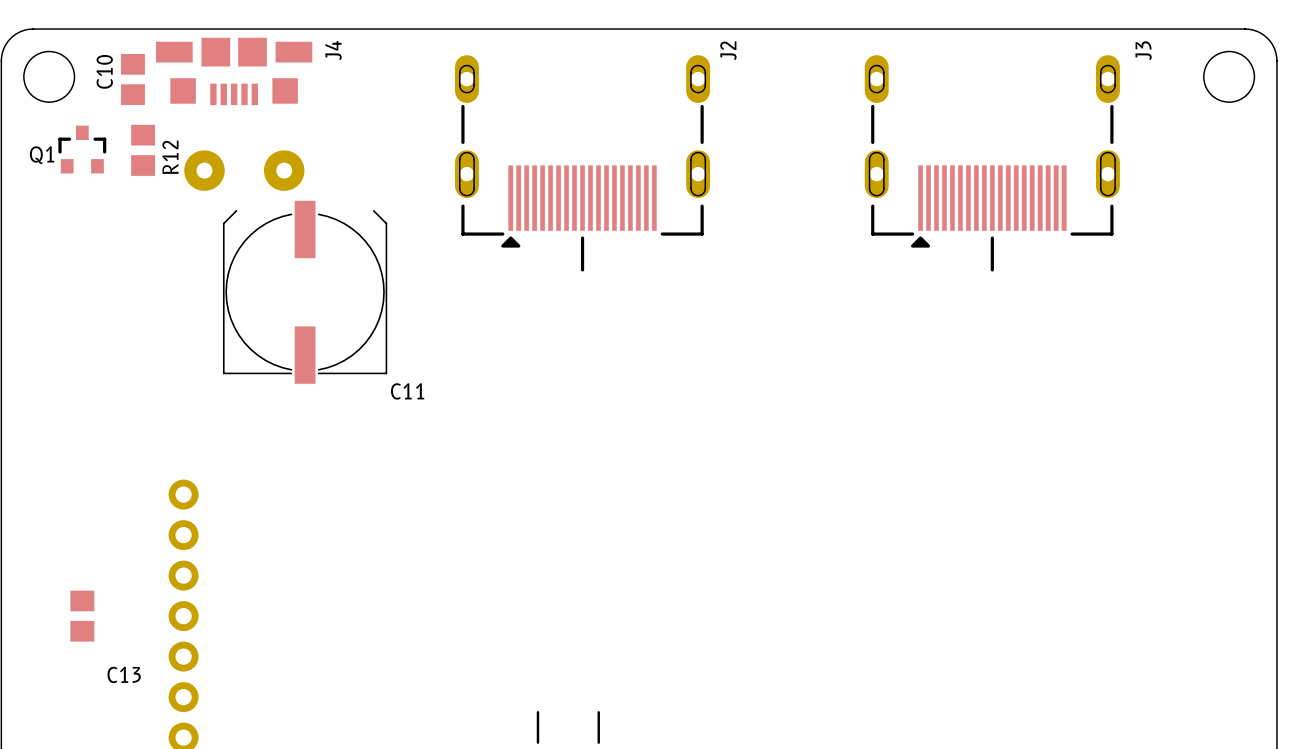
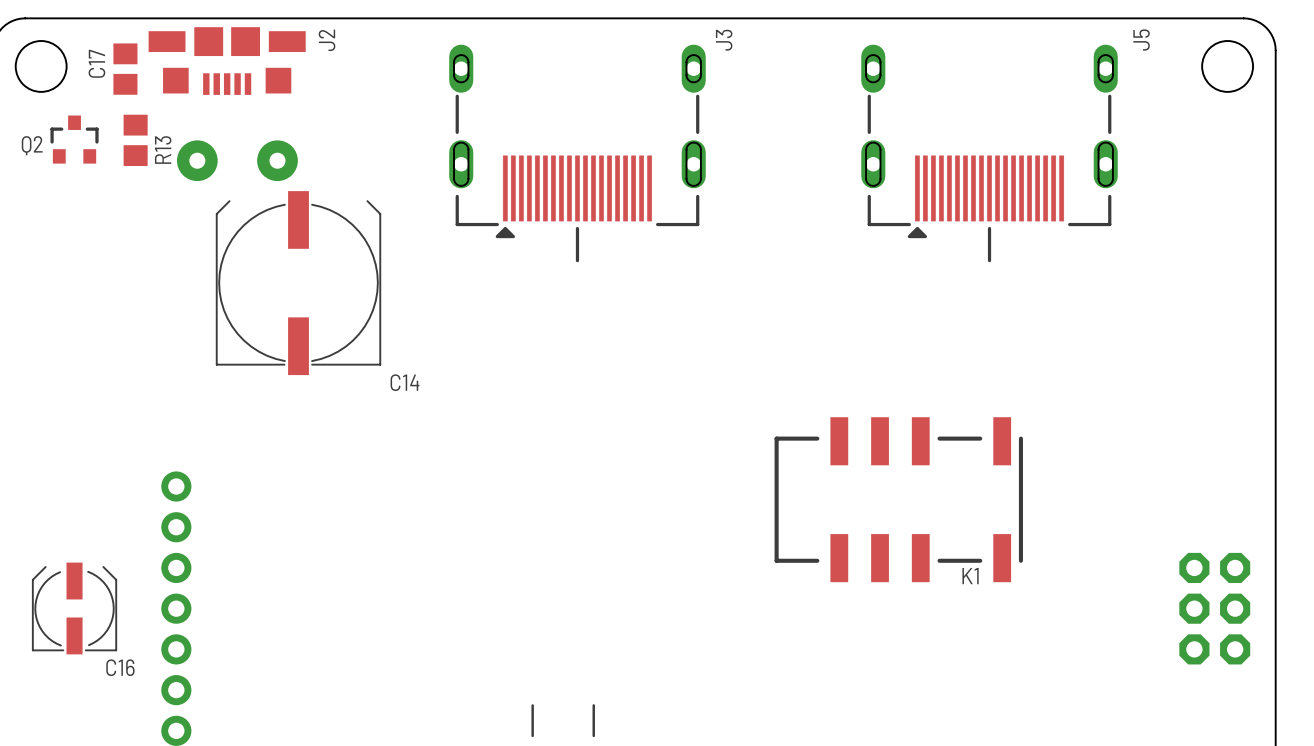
J4 name: J4 (333, 50) -> J2 (327, 40)
J2 name: J2 (728, 50) -> J3 (724, 40)
J3 name: J3 (1143, 50) -> J5 (1141, 40)
C10 name: C10 (104, 71) -> C17 (96, 63)
Q1 name: Q1 (41, 155) -> Q2 (32, 145)
R12 name: R12 (170, 157) -> R13 (163, 150)
C11 name: C11 (407, 391) -> C14 (405, 382)
K1: none -> (898, 499)
C16: none -> (74, 608)
C13: (82, 616) -> none
part: none -> (1214, 608)

